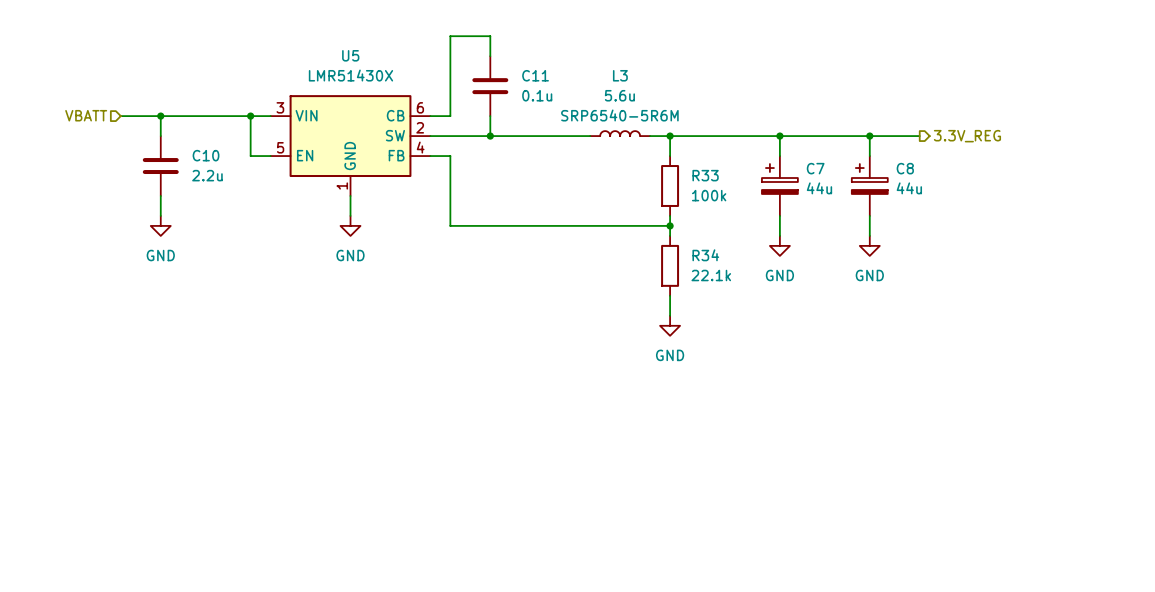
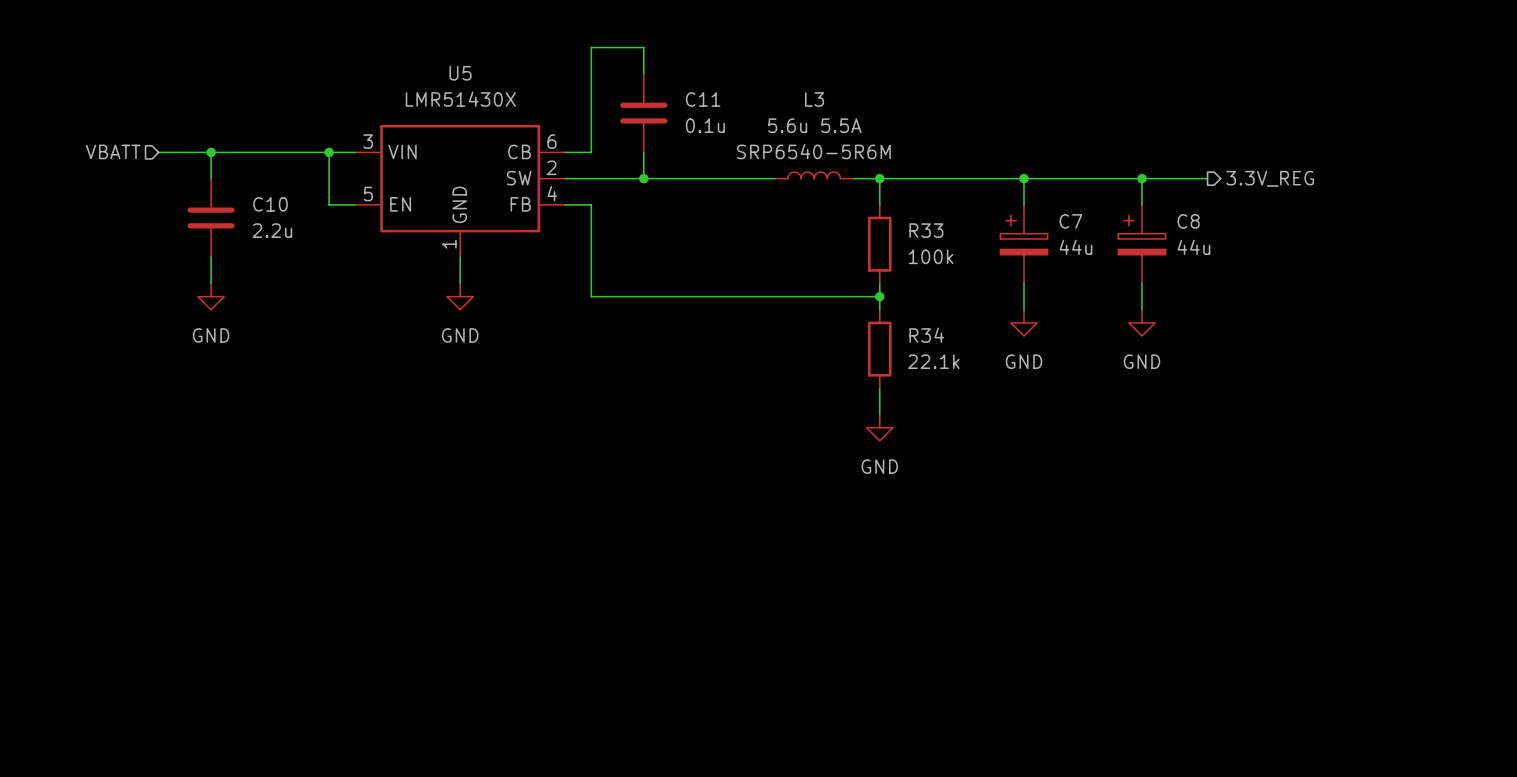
L3 value: 5.6u (619, 95) -> 5.6u 5.5A (814, 125)

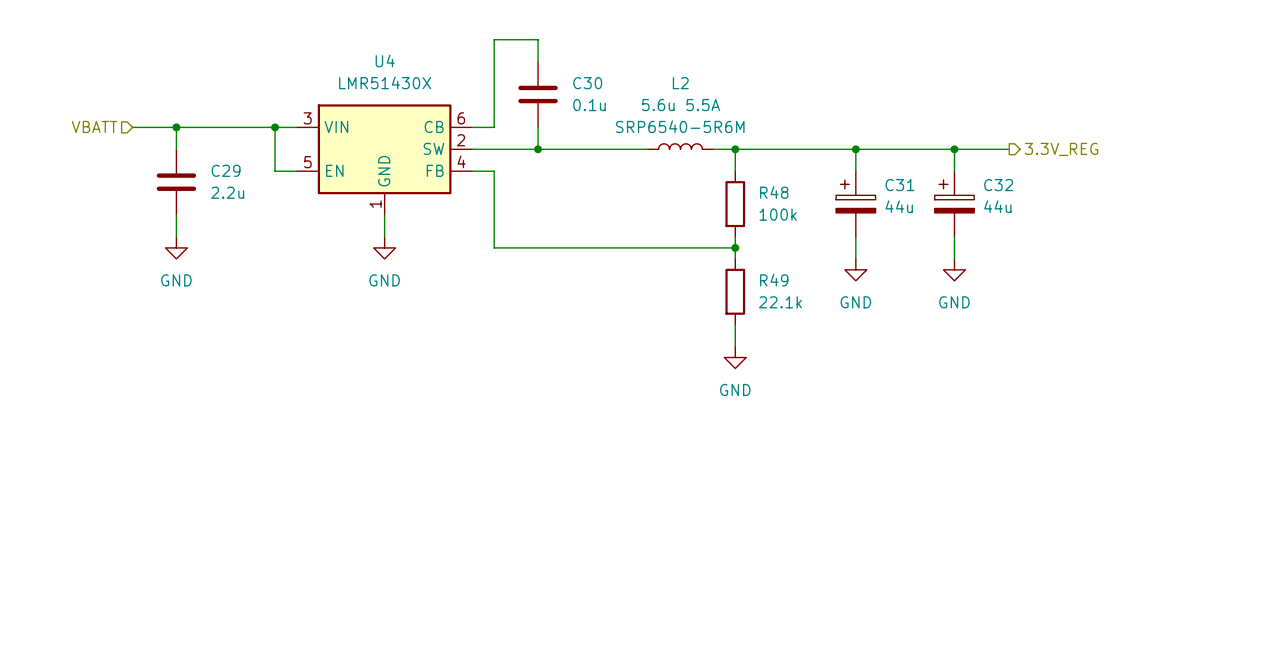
U5 name: U5 (460, 73) -> U4 (385, 60)
C11 name: C11 (703, 99) -> C30 (587, 83)
L3 name: L3 (814, 99) -> L2 (680, 83)
C10 name: C10 (270, 204) -> C29 (226, 170)
C7 name: C7 (1070, 221) -> C31 (900, 185)
C8 name: C8 (1188, 221) -> C32 (998, 185)
R33 name: R33 (926, 230) -> R48 (774, 192)
R34 name: R34 (926, 335) -> R49 (774, 280)

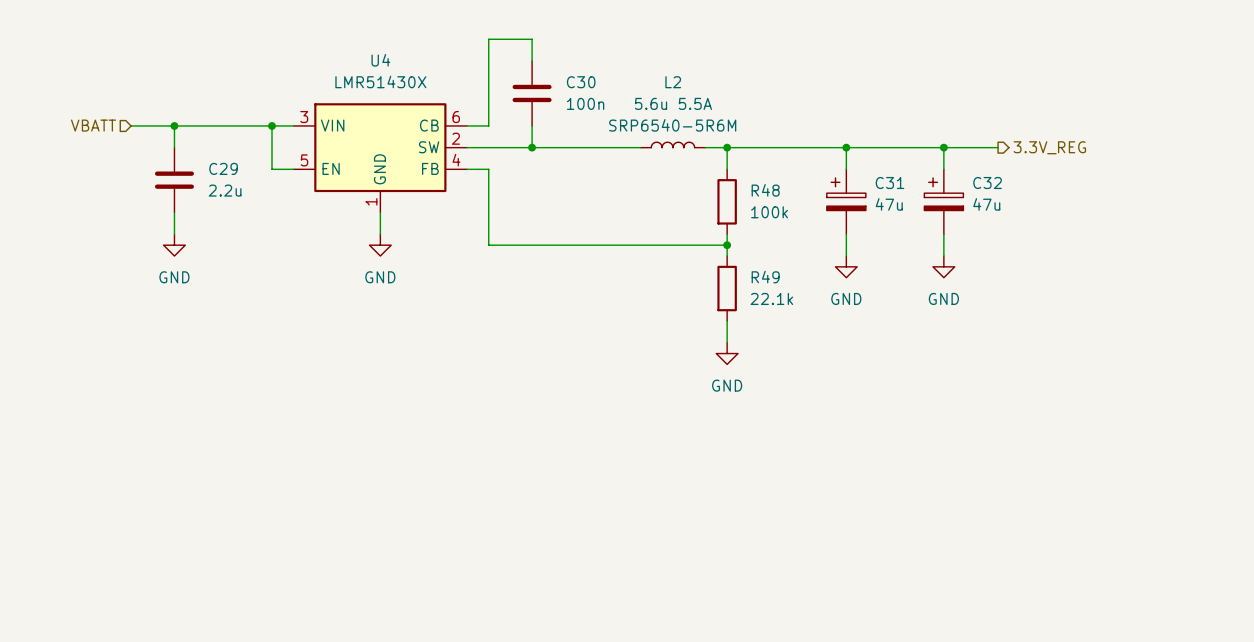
C30 value: 0.1u (589, 105) -> 100n (585, 103)
C31 value: 44u (899, 206) -> 47u (889, 204)
C32 value: 44u (997, 206) -> 47u (986, 204)

